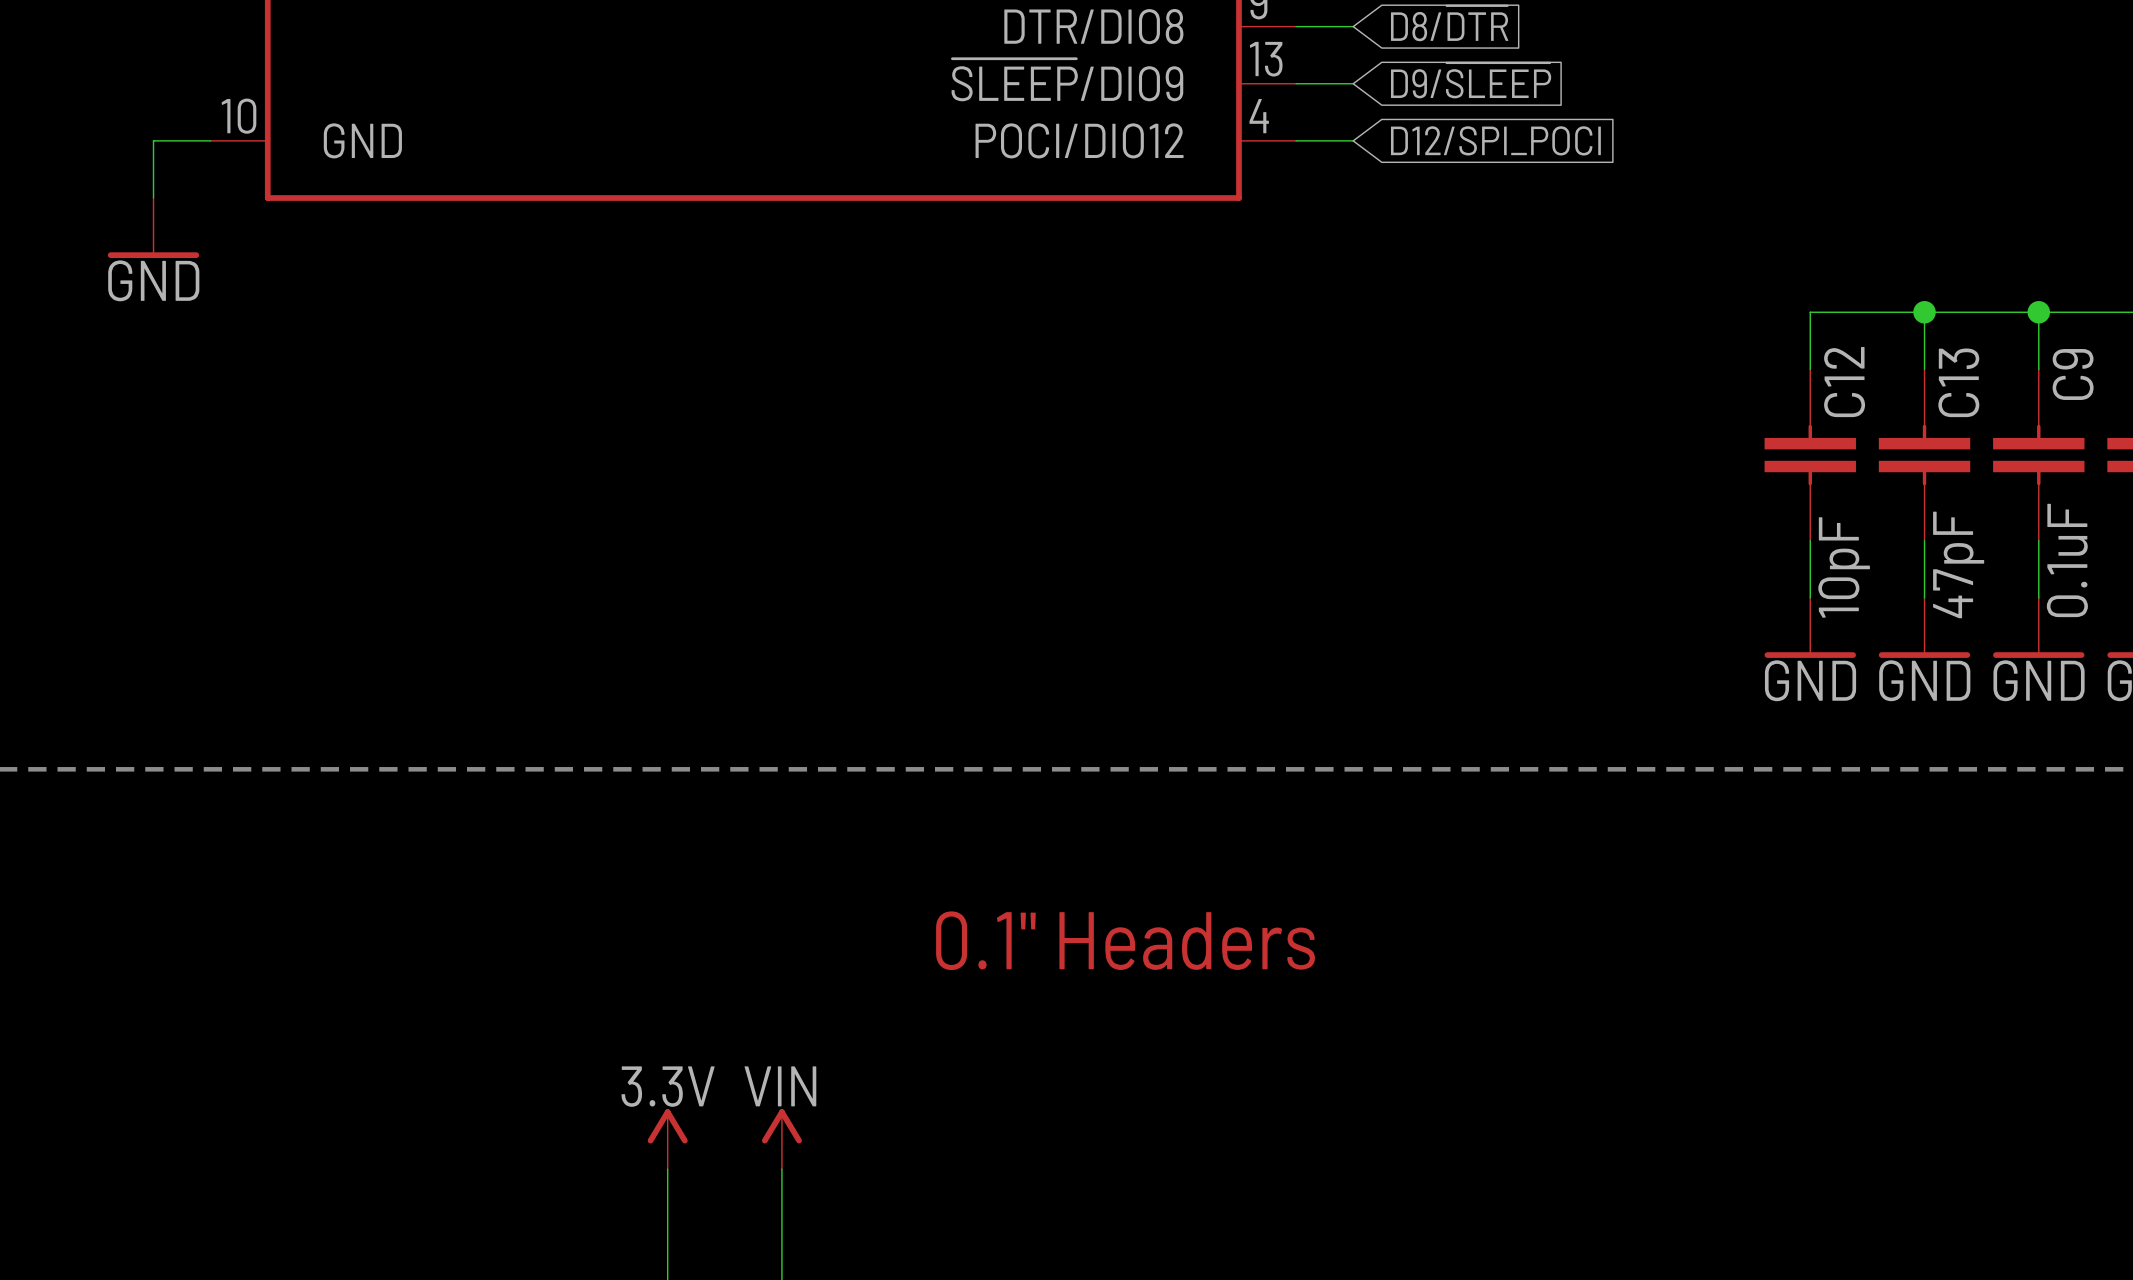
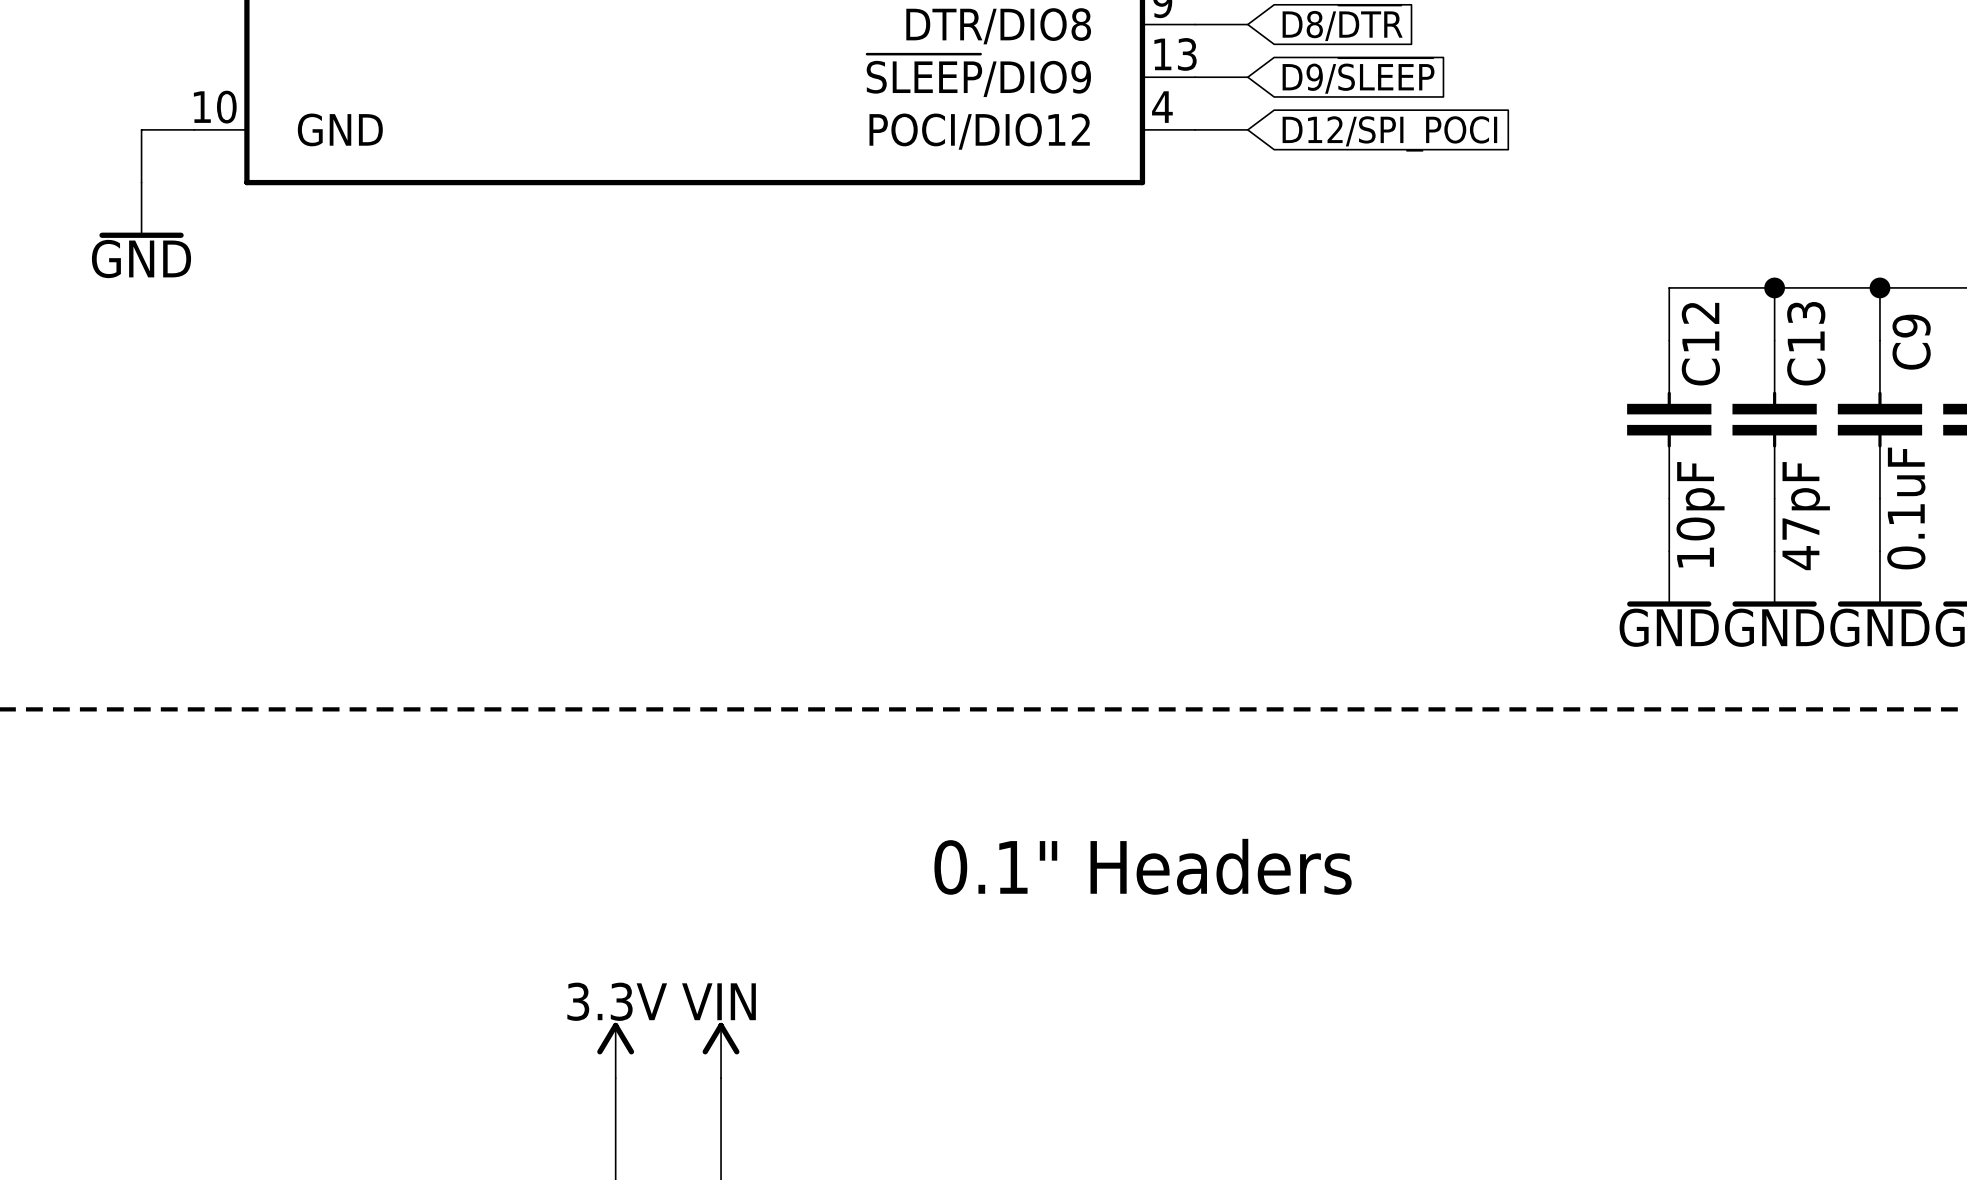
text position: 0.1" Headers (1125, 940) -> 0.1" Headers (1143, 866)

